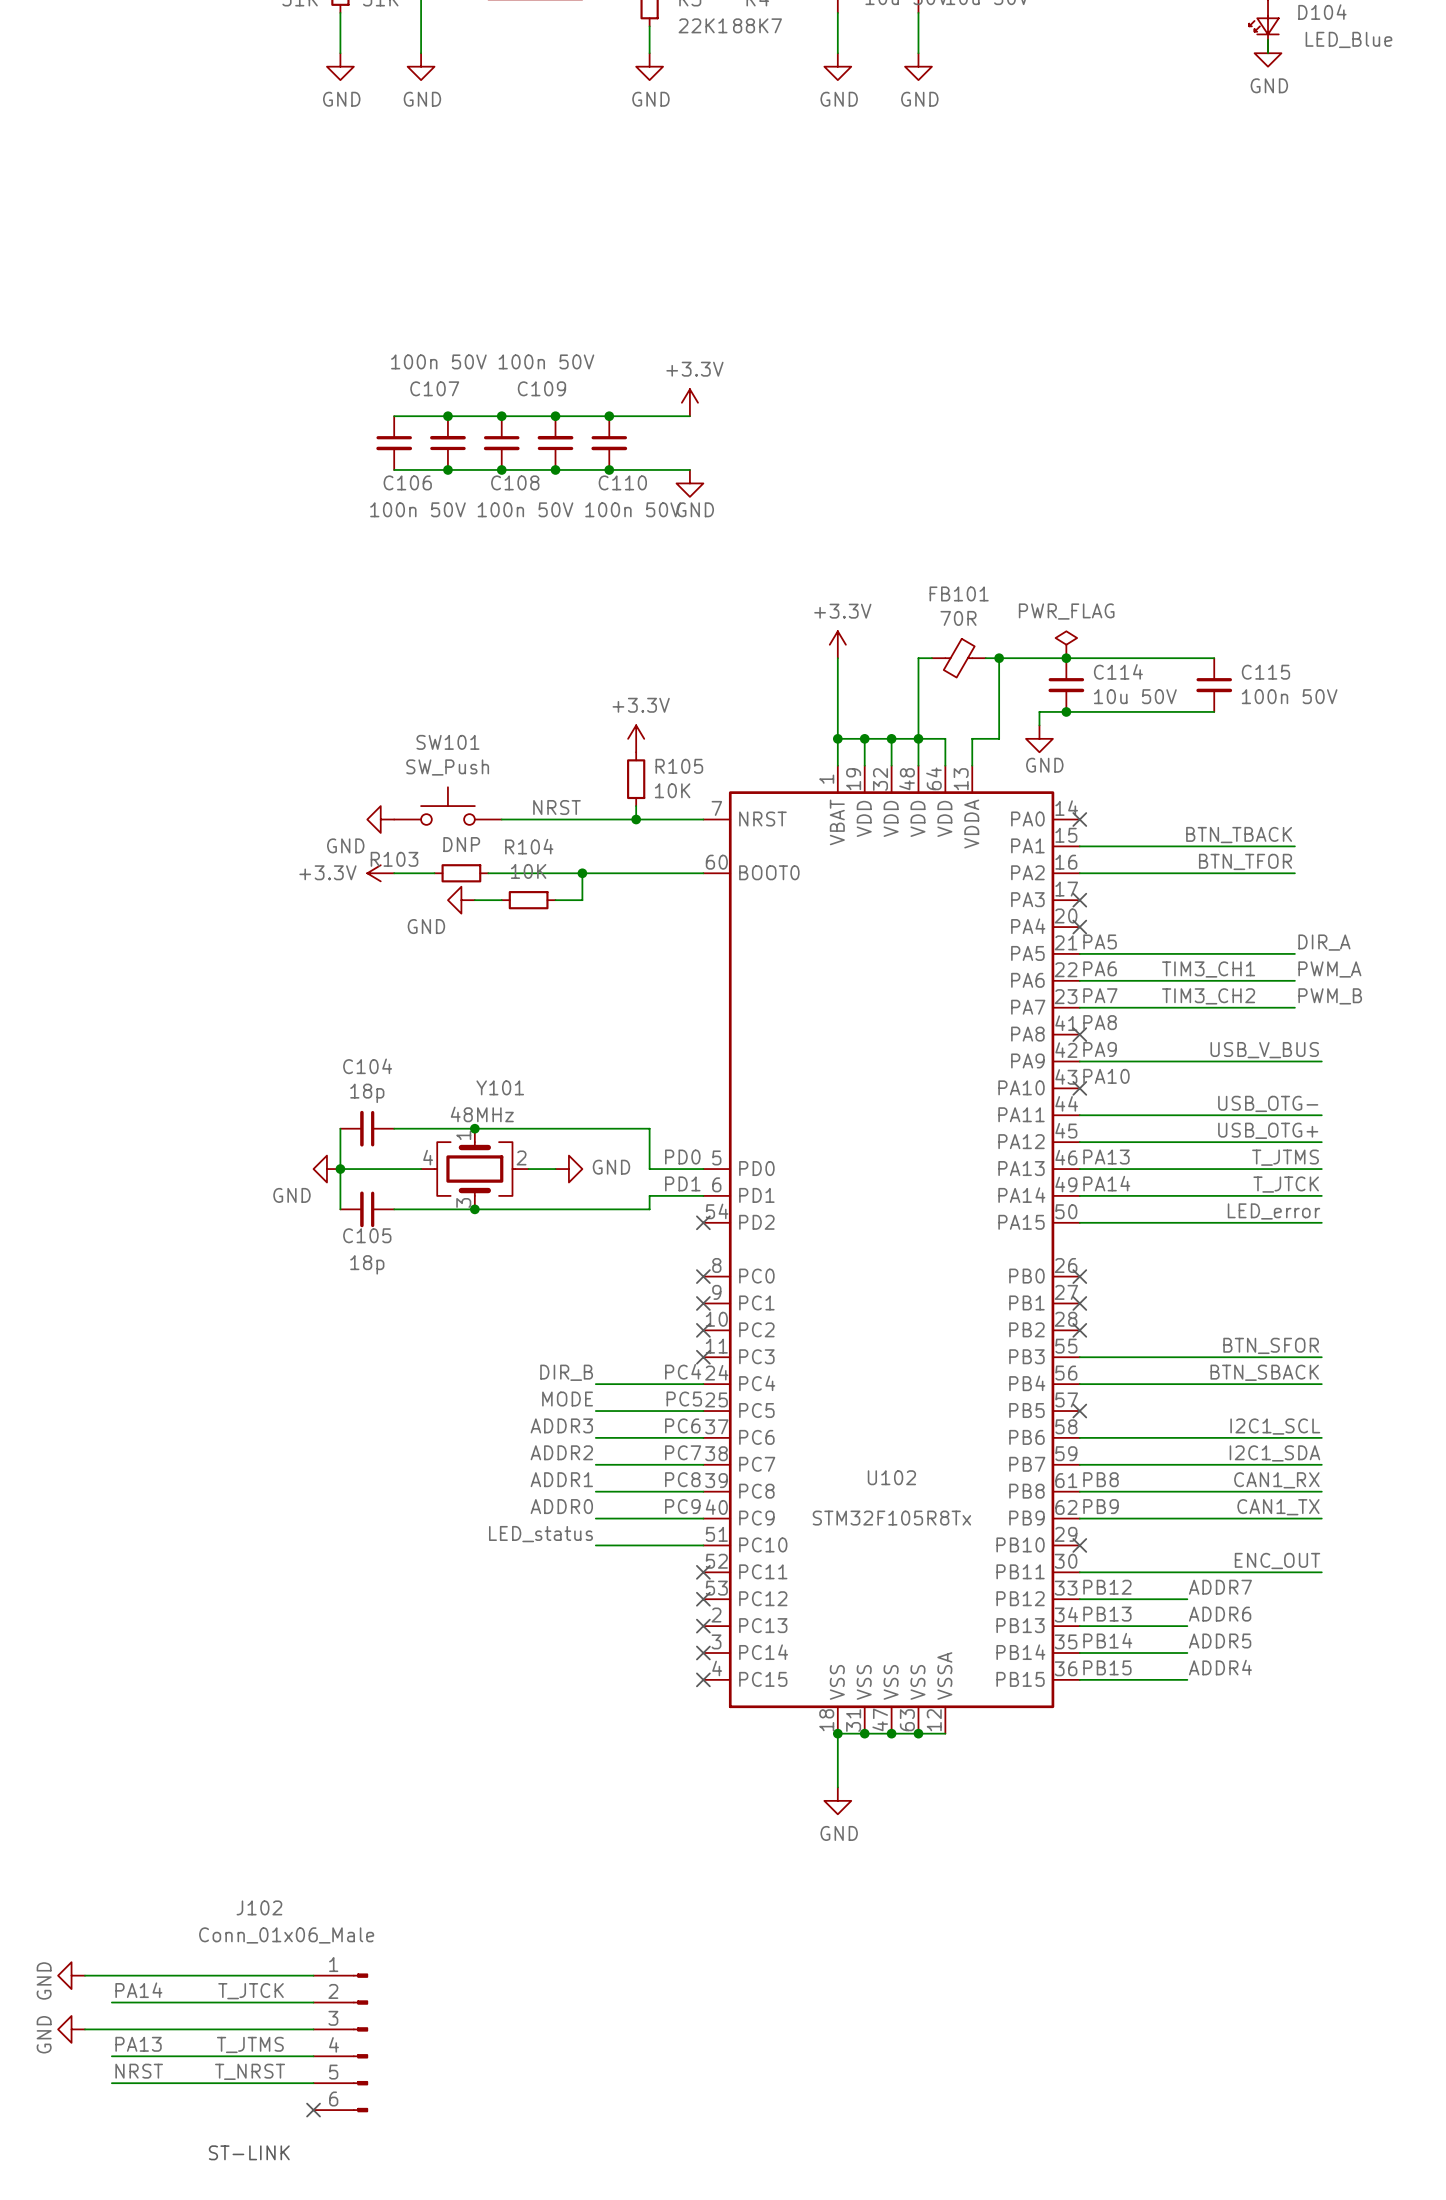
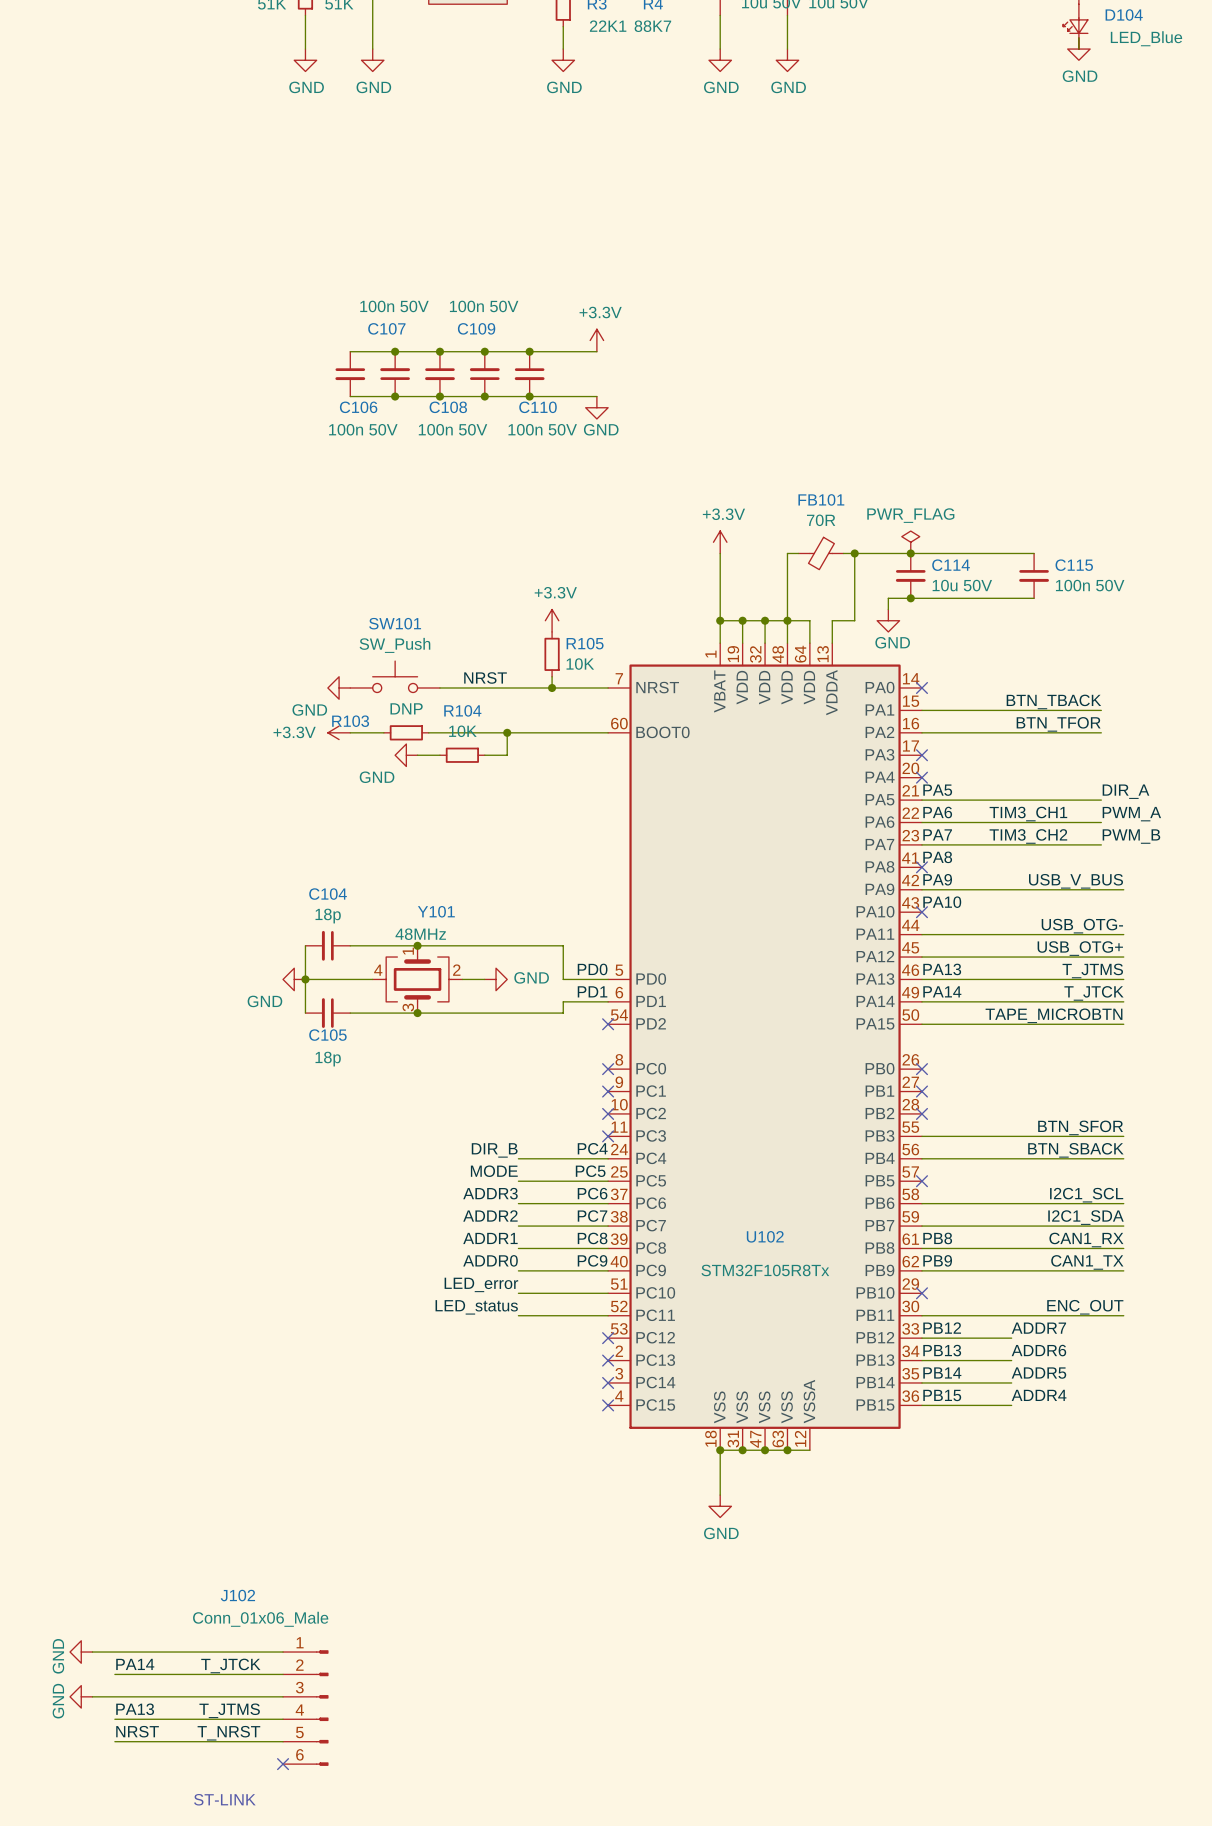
label: LED_error (1273, 1211) -> TAPE_MICROBTN (1054, 1015)
label: LED_status (541, 1534) -> LED_error (481, 1284)
label: none -> LED_status (476, 1307)
wire: none -> (518, 1315) (608, 1315)
no-connect mark: (703, 1572) -> none

